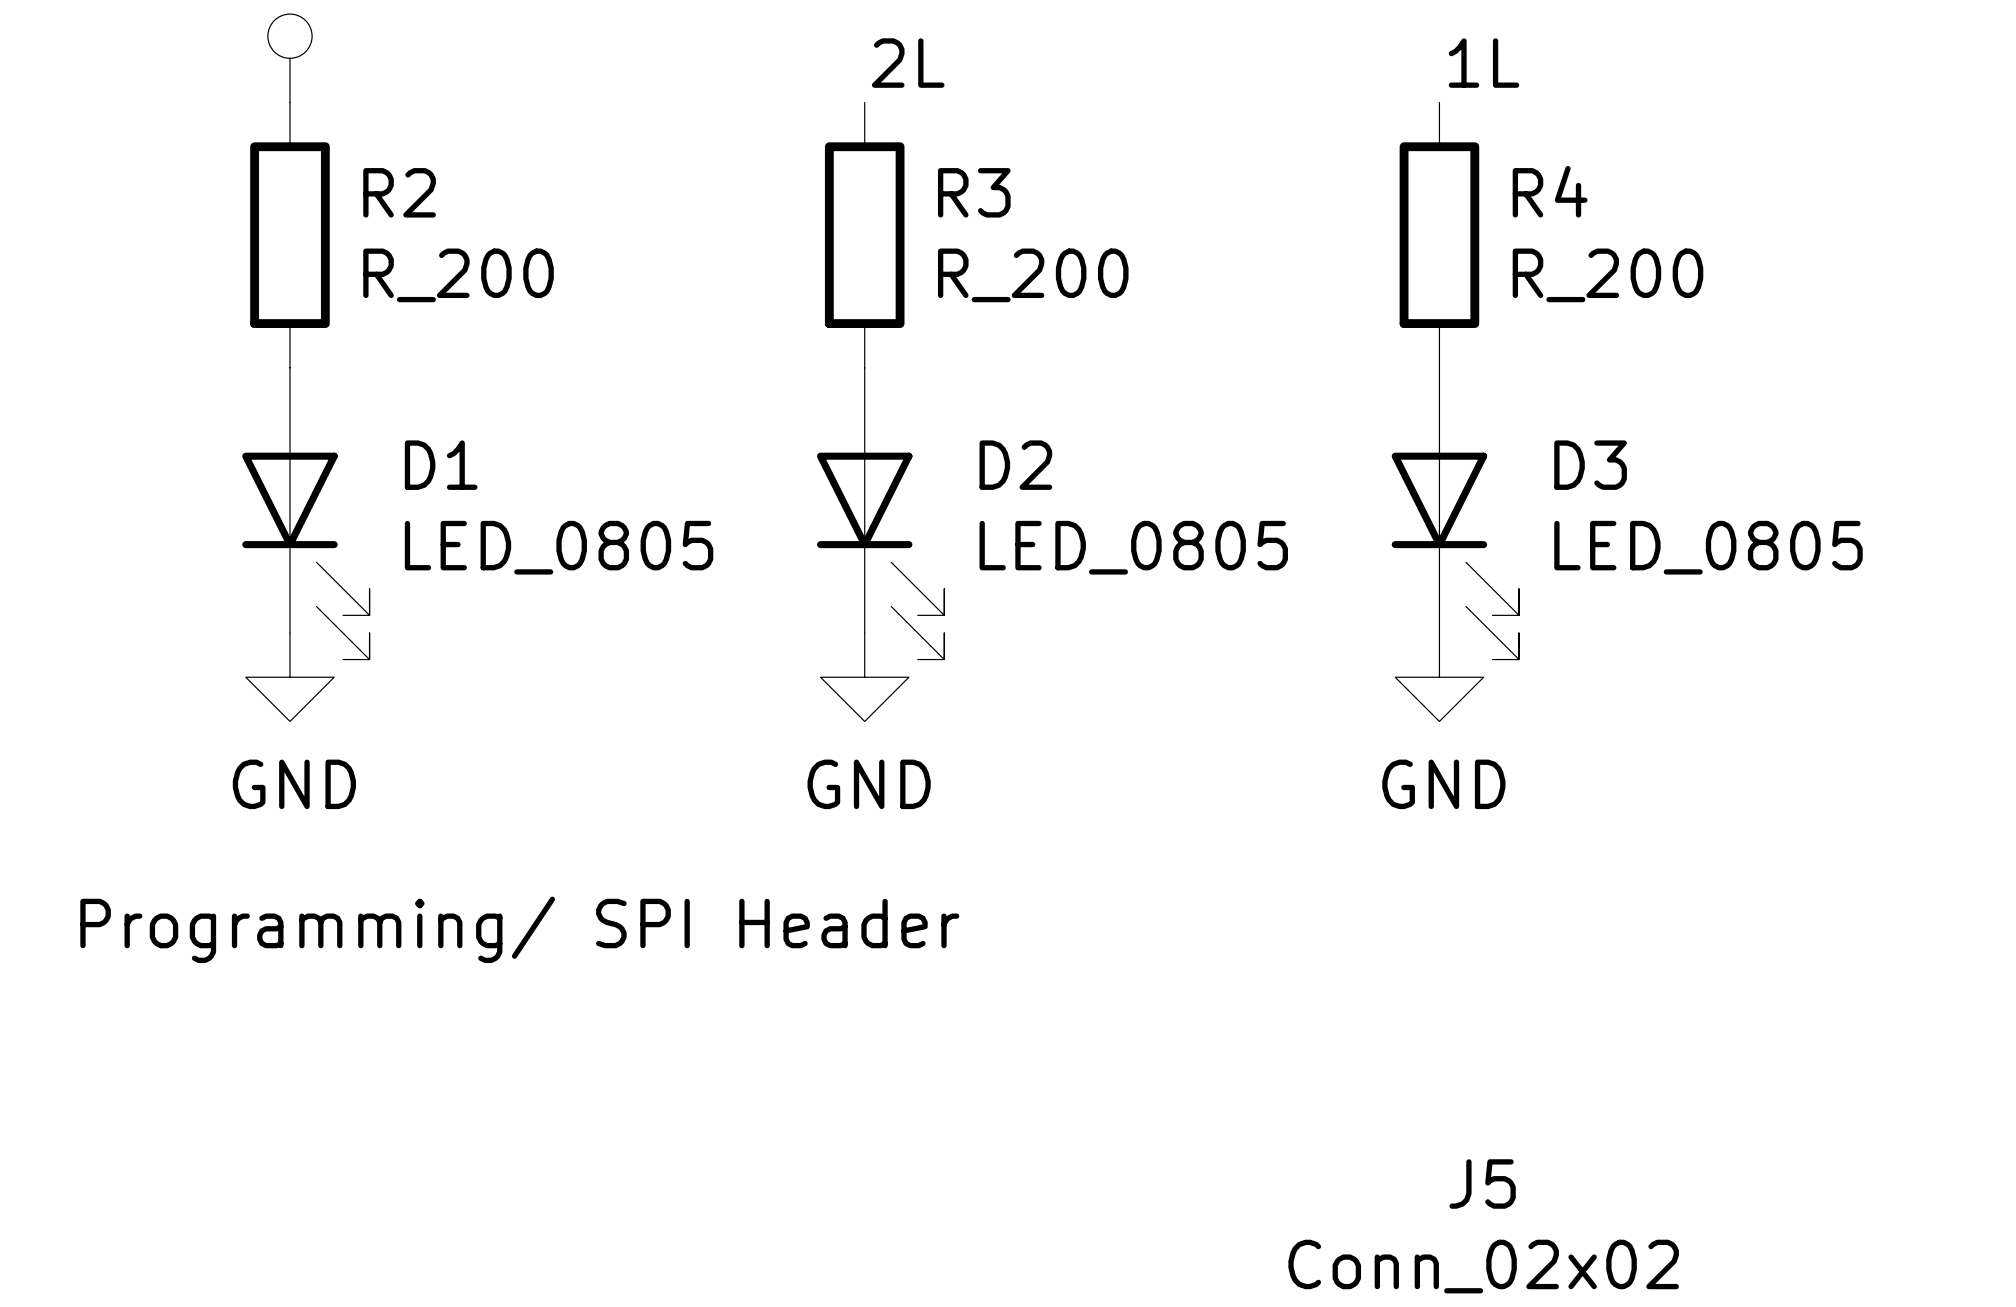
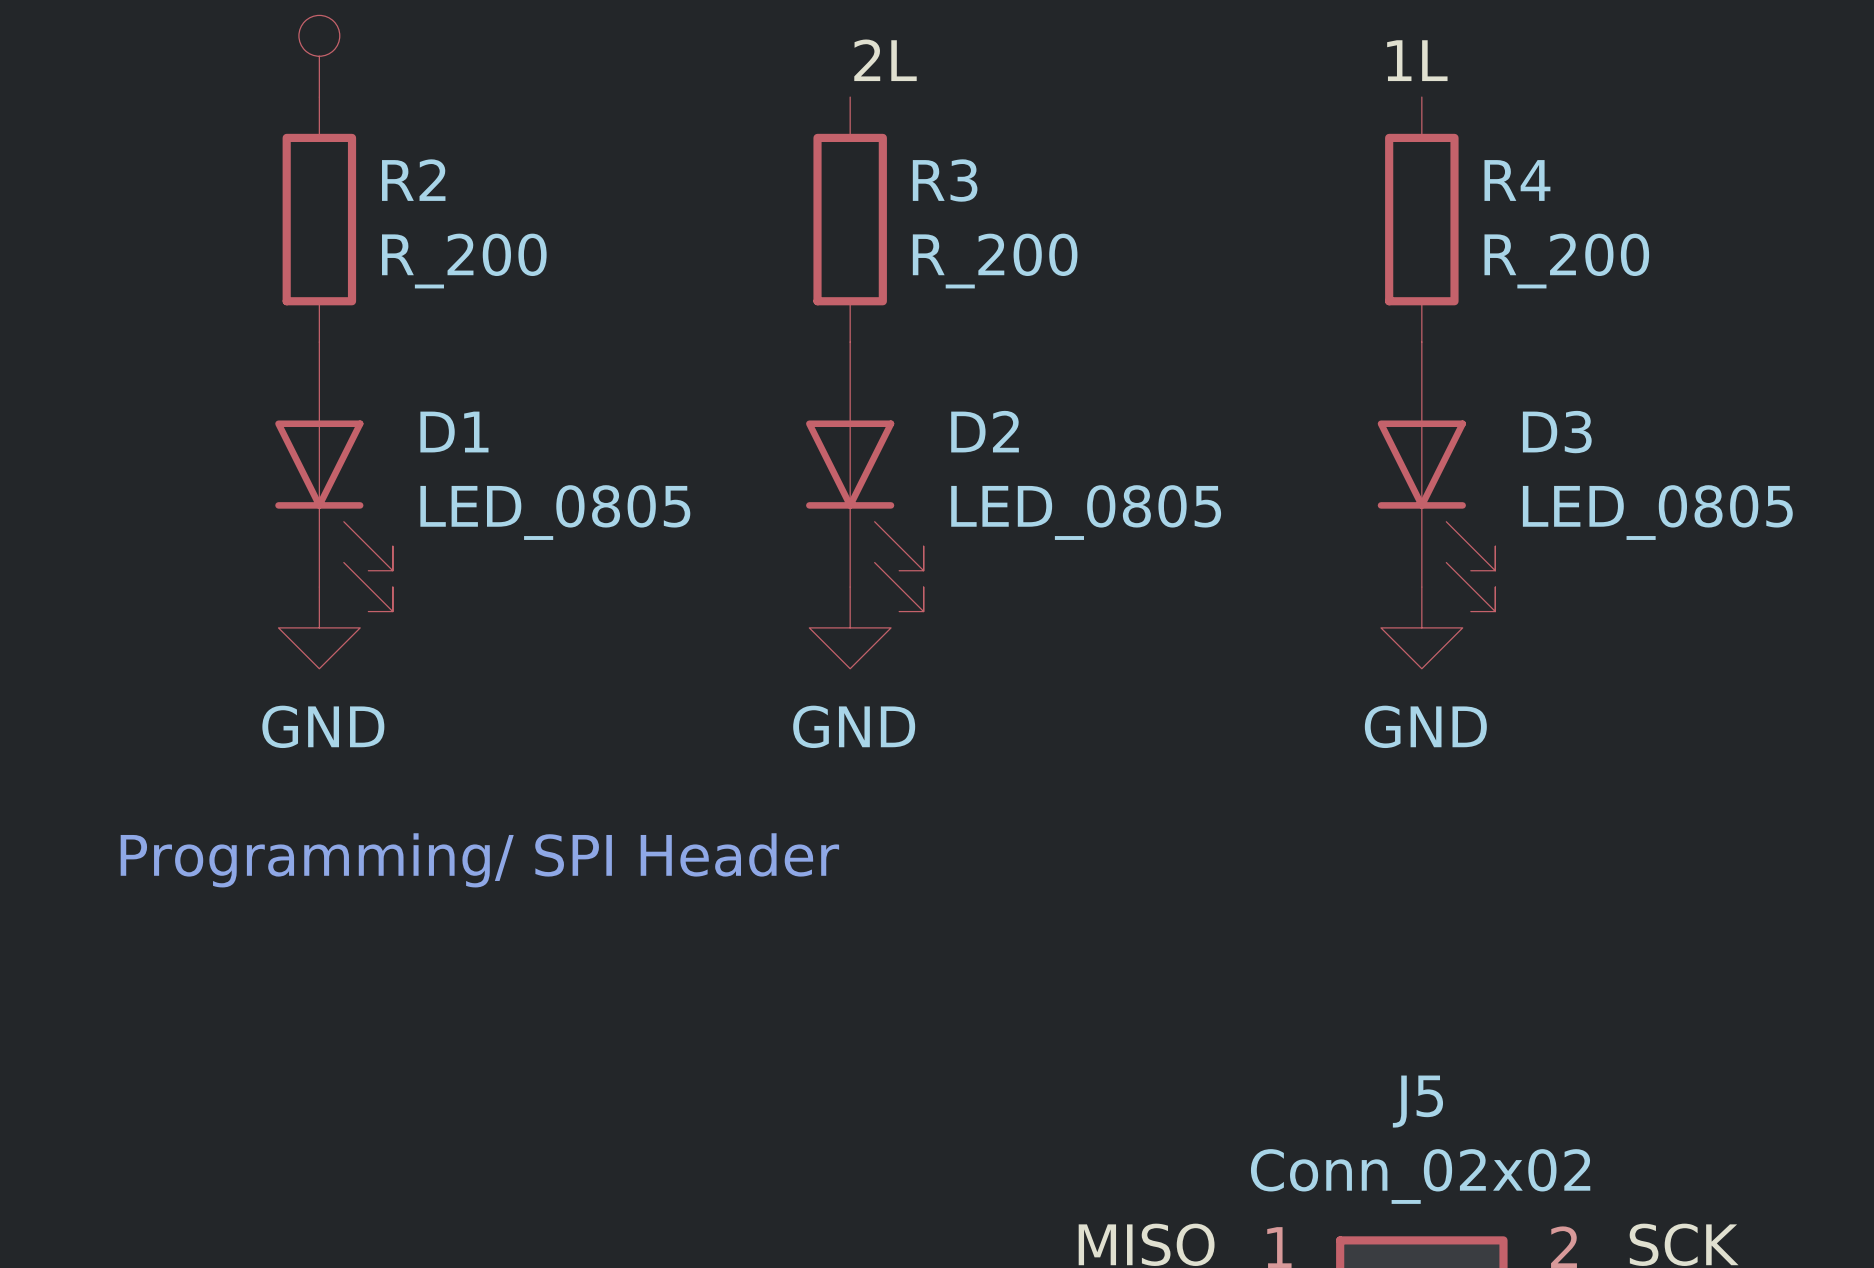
R4 position: (1439, 235) -> (1421, 219)
D3 position: (1455, 513) -> (1436, 476)
power symbol position: GND (1439, 677) -> GND (1421, 627)

